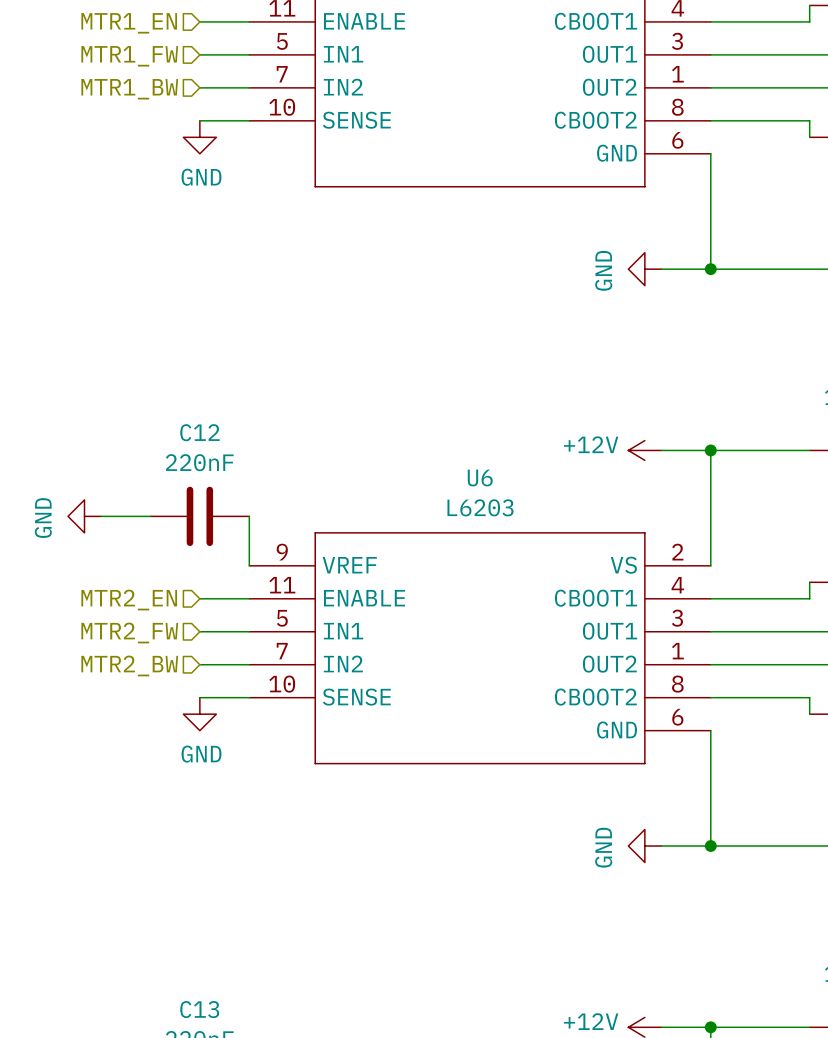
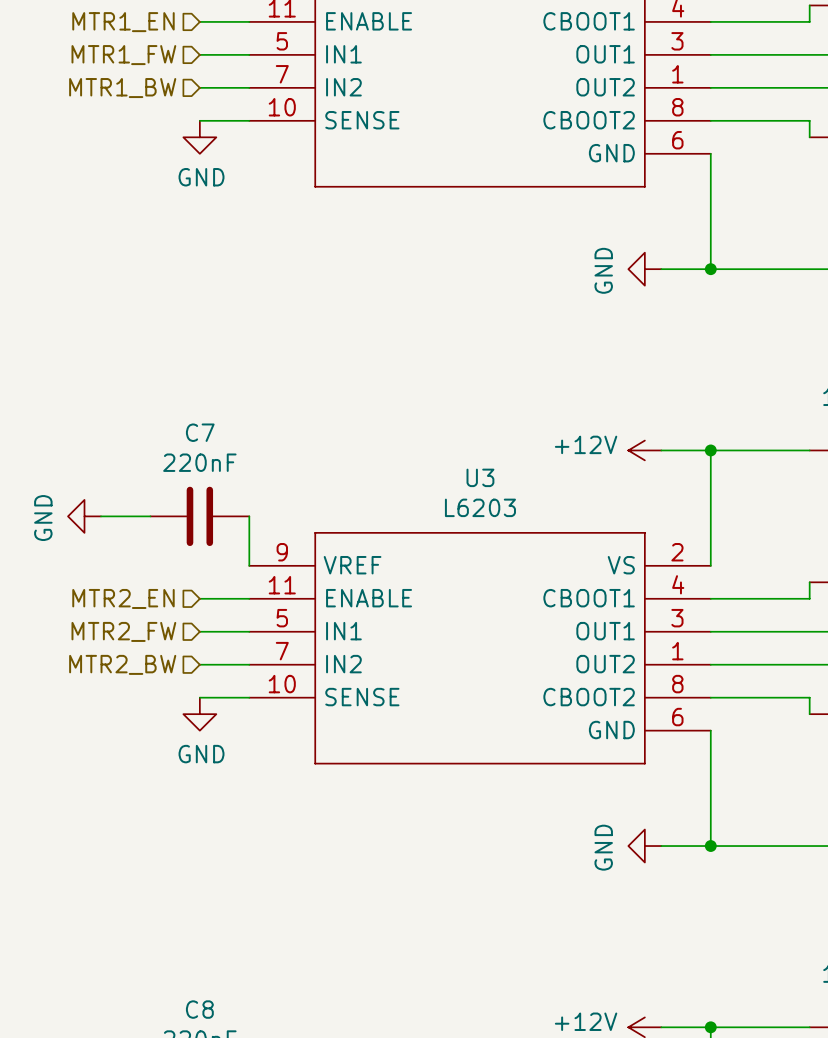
C12 name: C12 (199, 432) -> C7 (200, 432)
U6 name: U6 (480, 478) -> U3 (480, 477)
C13 name: C13 (199, 1009) -> C8 (199, 1009)

